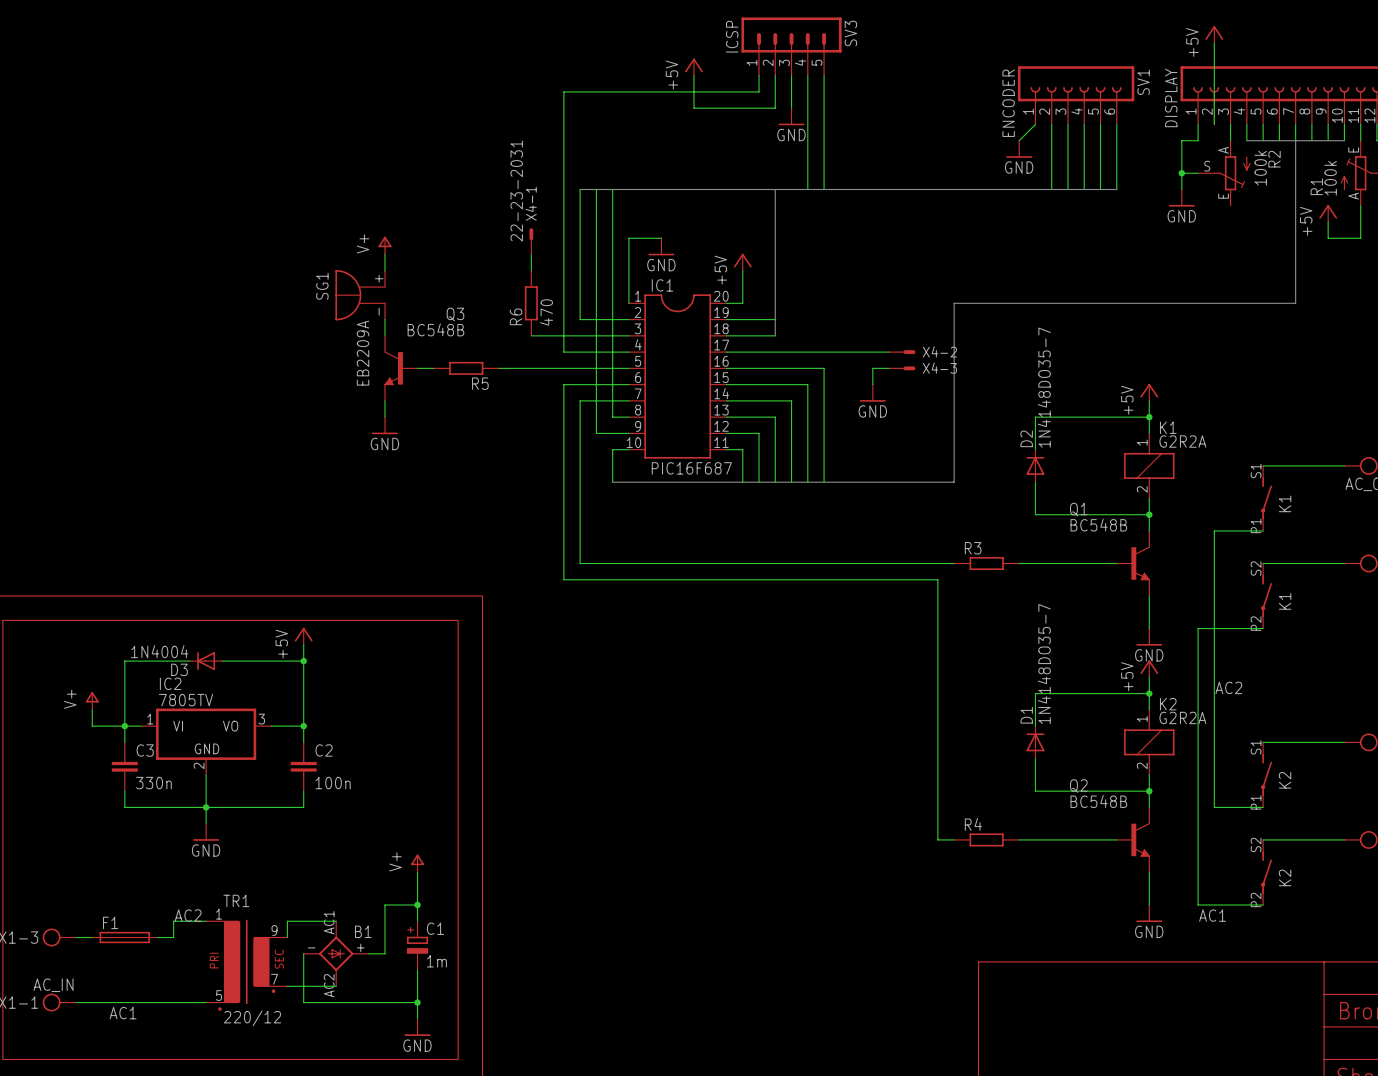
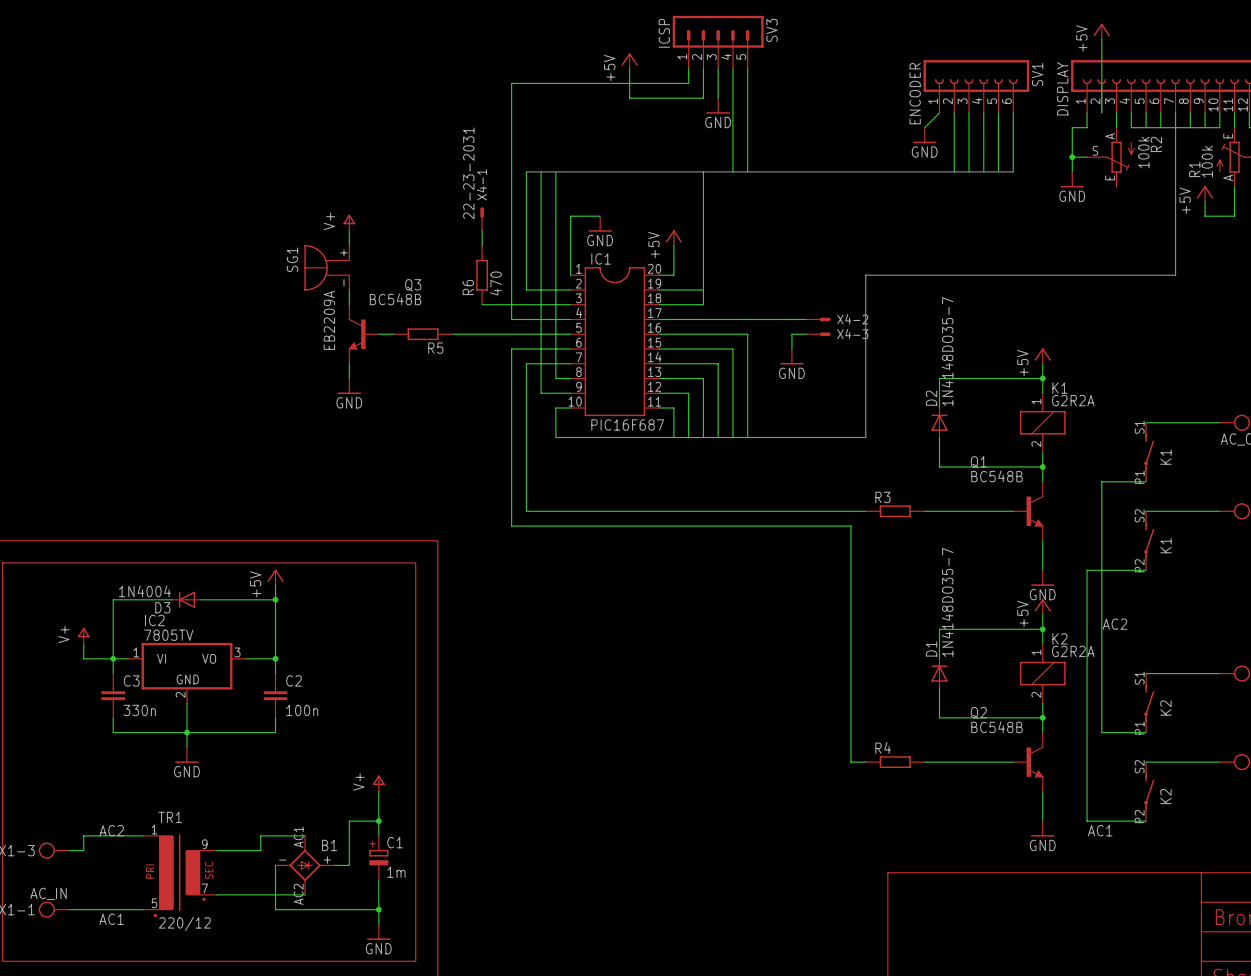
label position: AC2 (188, 915) -> AC2 (111, 830)
wire: none -> (142, 835) (83, 835) (83, 850)
wire: (206, 921) (173, 921) (173, 937) (157, 937) -> none
F1: (124, 937) -> none
TR1 position: (246, 965) -> (179, 875)

